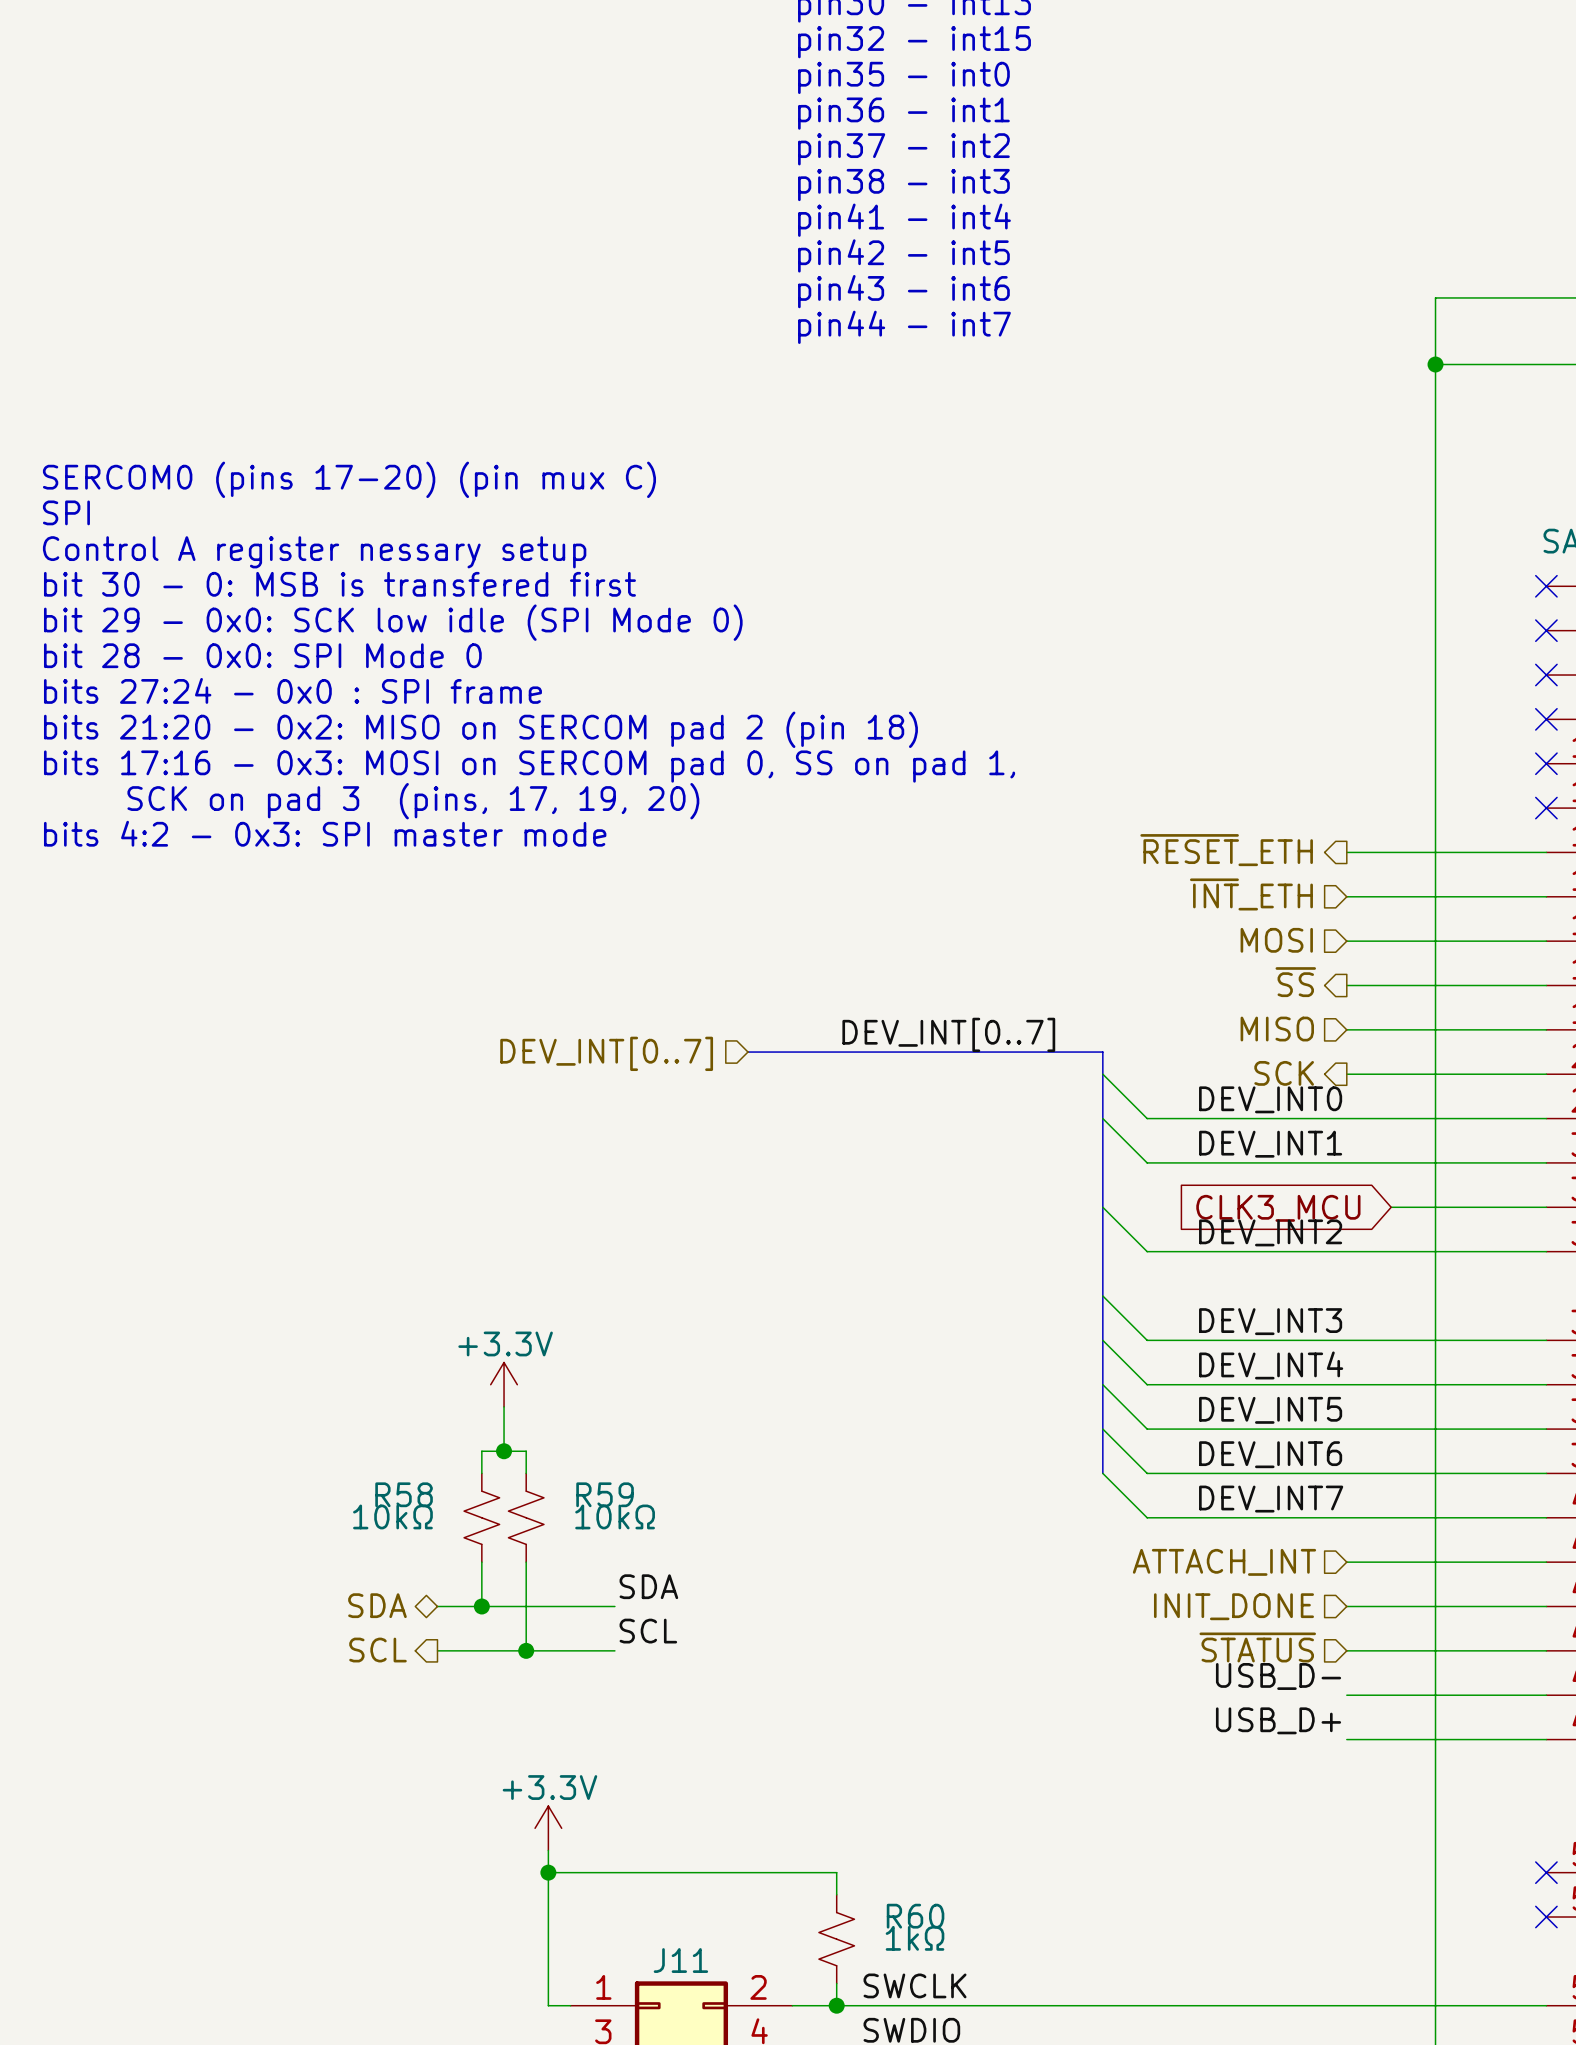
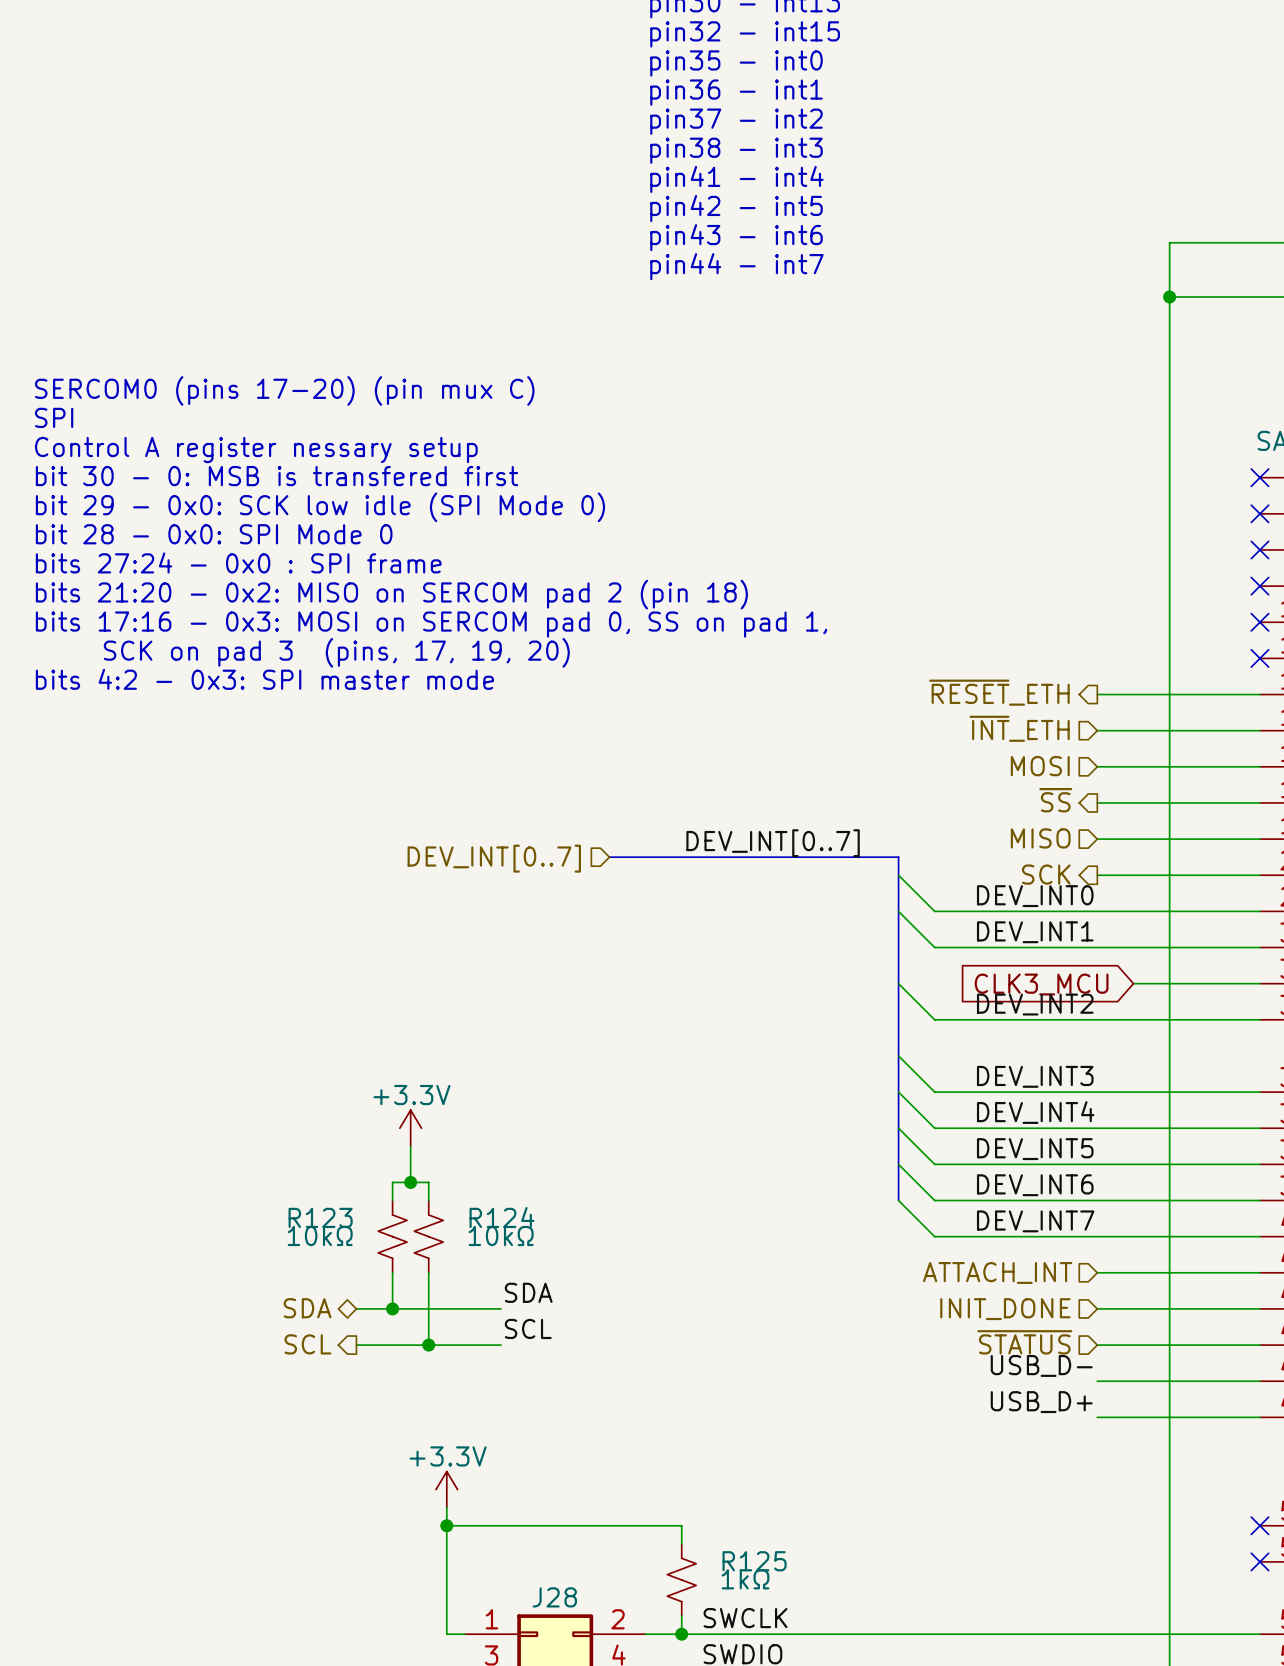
R58 name: R58 (404, 1494) -> R123 (320, 1217)
R59 name: R59 (605, 1494) -> R124 (502, 1217)
R60 name: R60 (915, 1916) -> R125 (754, 1561)
J11 name: J11 (680, 1960) -> J28 (554, 1597)

